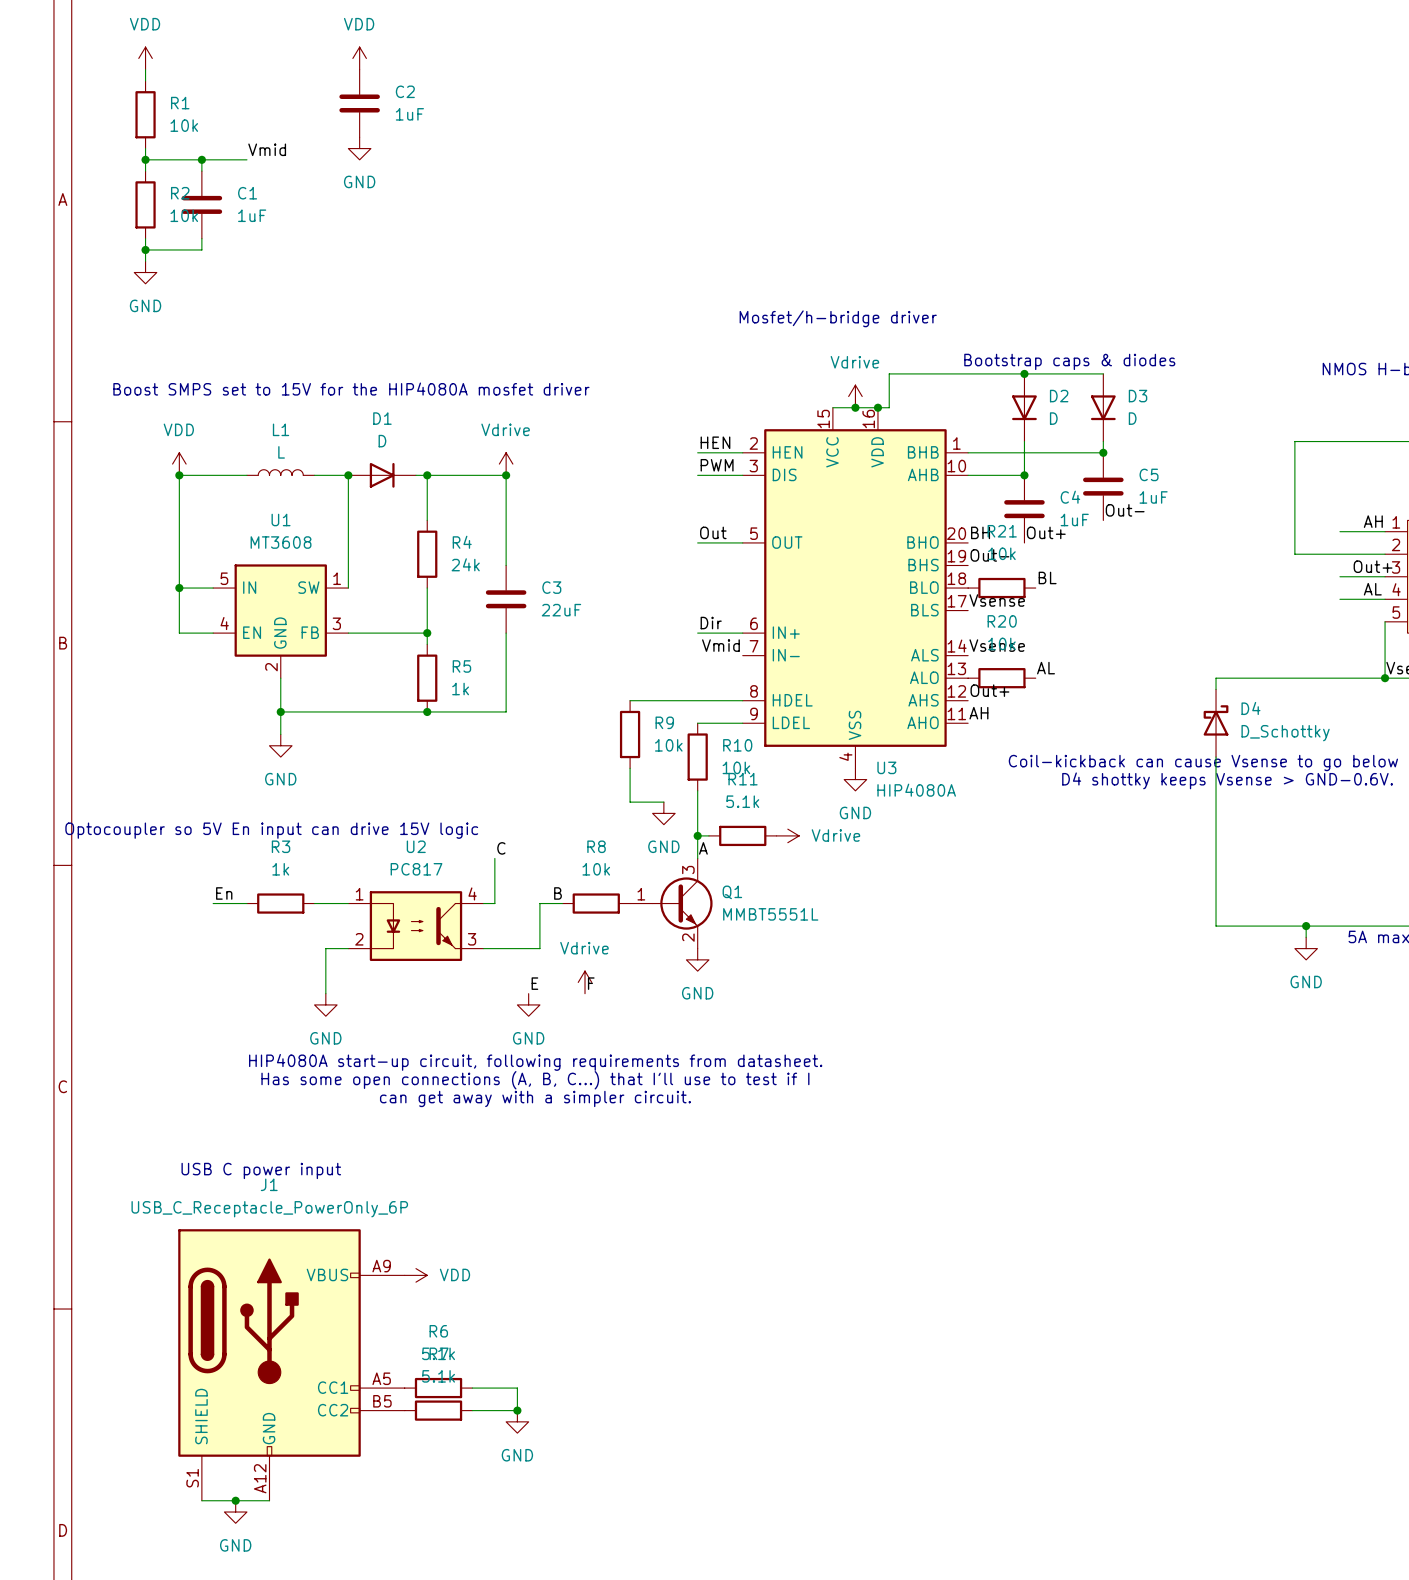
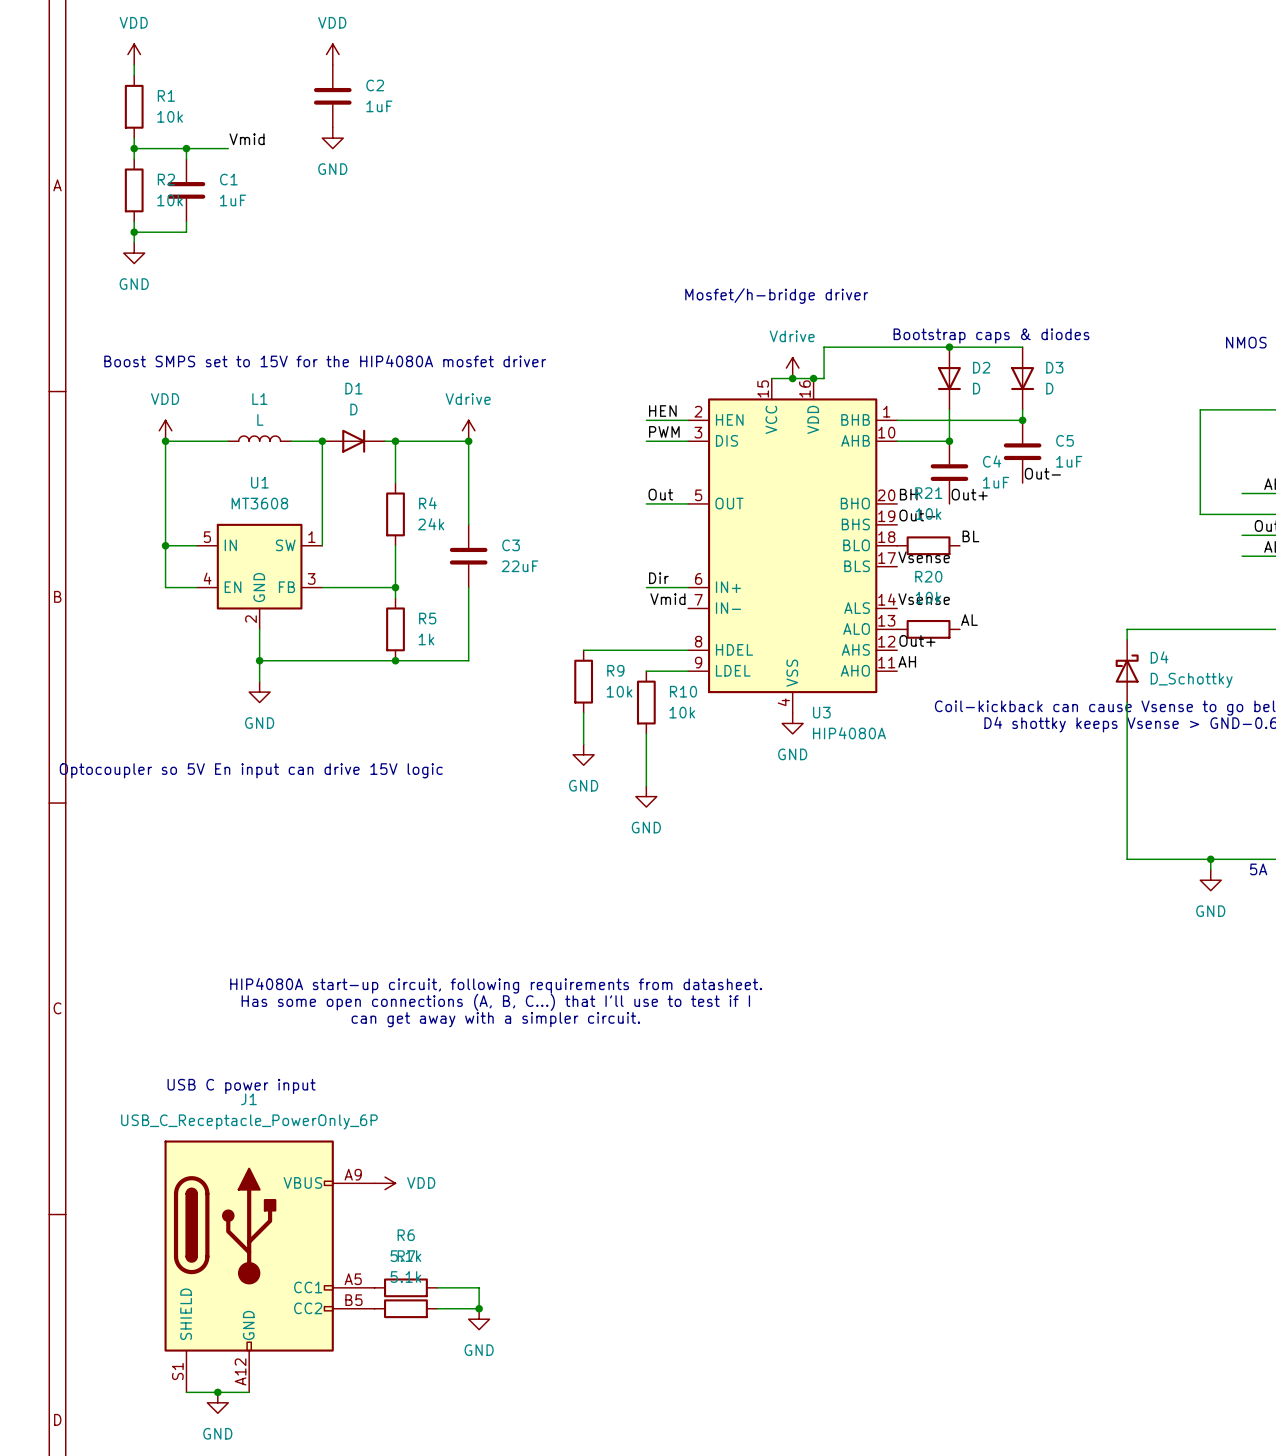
wire: (630, 802) (663, 802) -> none
power symbol: none -> GND (583, 754)
power symbol: GND (663, 813) -> none
wire: (697, 835) (708, 835) -> none
junction: (697, 835) -> none
R11: 5.1k (742, 835) -> none
power symbol: Vdrive (787, 835) -> none
label: C (501, 848) -> none
label: A (703, 848) -> none
wire: (494, 858) (494, 903) (483, 903) -> none
power symbol: none -> GND (646, 796)
label: En (224, 893) -> none
label: B (557, 893) -> none
wire: (213, 903) (246, 903) -> none
R3: 1k (280, 903) -> none
wire: (314, 903) (348, 903) -> none
wire: (562, 903) (539, 903) (539, 948) (483, 948) -> none
R8: 10k (596, 903) -> none
Q1: MMBT5551L (671, 903) -> none
U2: PC817 (415, 926) -> none
wire: (348, 948) (325, 948) (325, 993) -> none
power symbol: GND (697, 959) -> none
power symbol: Vdrive (585, 982) -> none
label: E (534, 983) -> none
label: F (591, 983) -> none
power symbol: GND (325, 1004) -> none
power symbol: GND (528, 1004) -> none

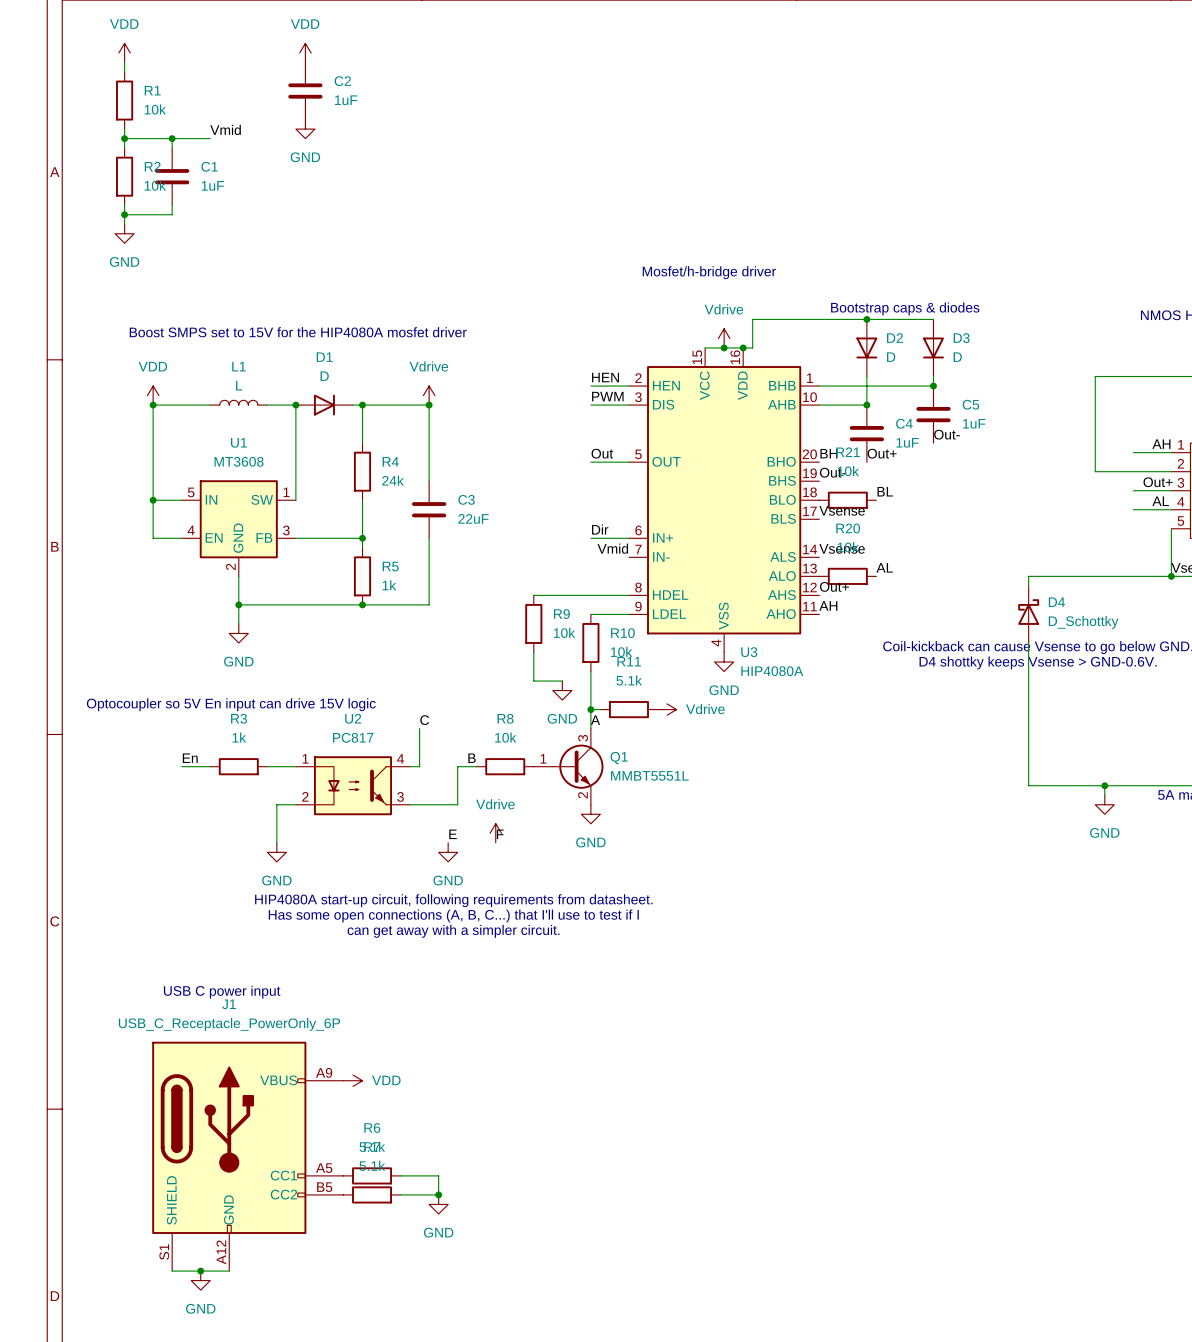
wire: none -> (533, 681) (562, 681)
power symbol: GND (583, 754) -> none
power symbol: none -> GND (562, 690)
wire: none -> (590, 709) (600, 709)
junction: none -> (590, 709)
R11: none -> 5.1k (628, 709)
power symbol: none -> Vdrive (667, 709)
label: none -> C (424, 720)
label: none -> A (595, 720)
wire: none -> (419, 728) (419, 766) (410, 766)
power symbol: GND (646, 796) -> none
label: none -> En (190, 758)
label: none -> B (472, 758)
wire: none -> (181, 766) (210, 766)
R3: none -> 1k (238, 766)
wire: none -> (267, 766) (295, 766)
wire: none -> (476, 766) (457, 766) (457, 804) (410, 804)
R8: none -> 10k (505, 766)
Q1: none -> MMBT5551L (568, 766)
U2: none -> PC817 (352, 785)
wire: none -> (295, 804) (276, 804) (276, 842)
power symbol: none -> GND (590, 814)
power symbol: none -> Vdrive (495, 833)
label: none -> E (453, 834)
label: none -> F (500, 834)
power symbol: none -> GND (276, 852)
power symbol: none -> GND (448, 852)

